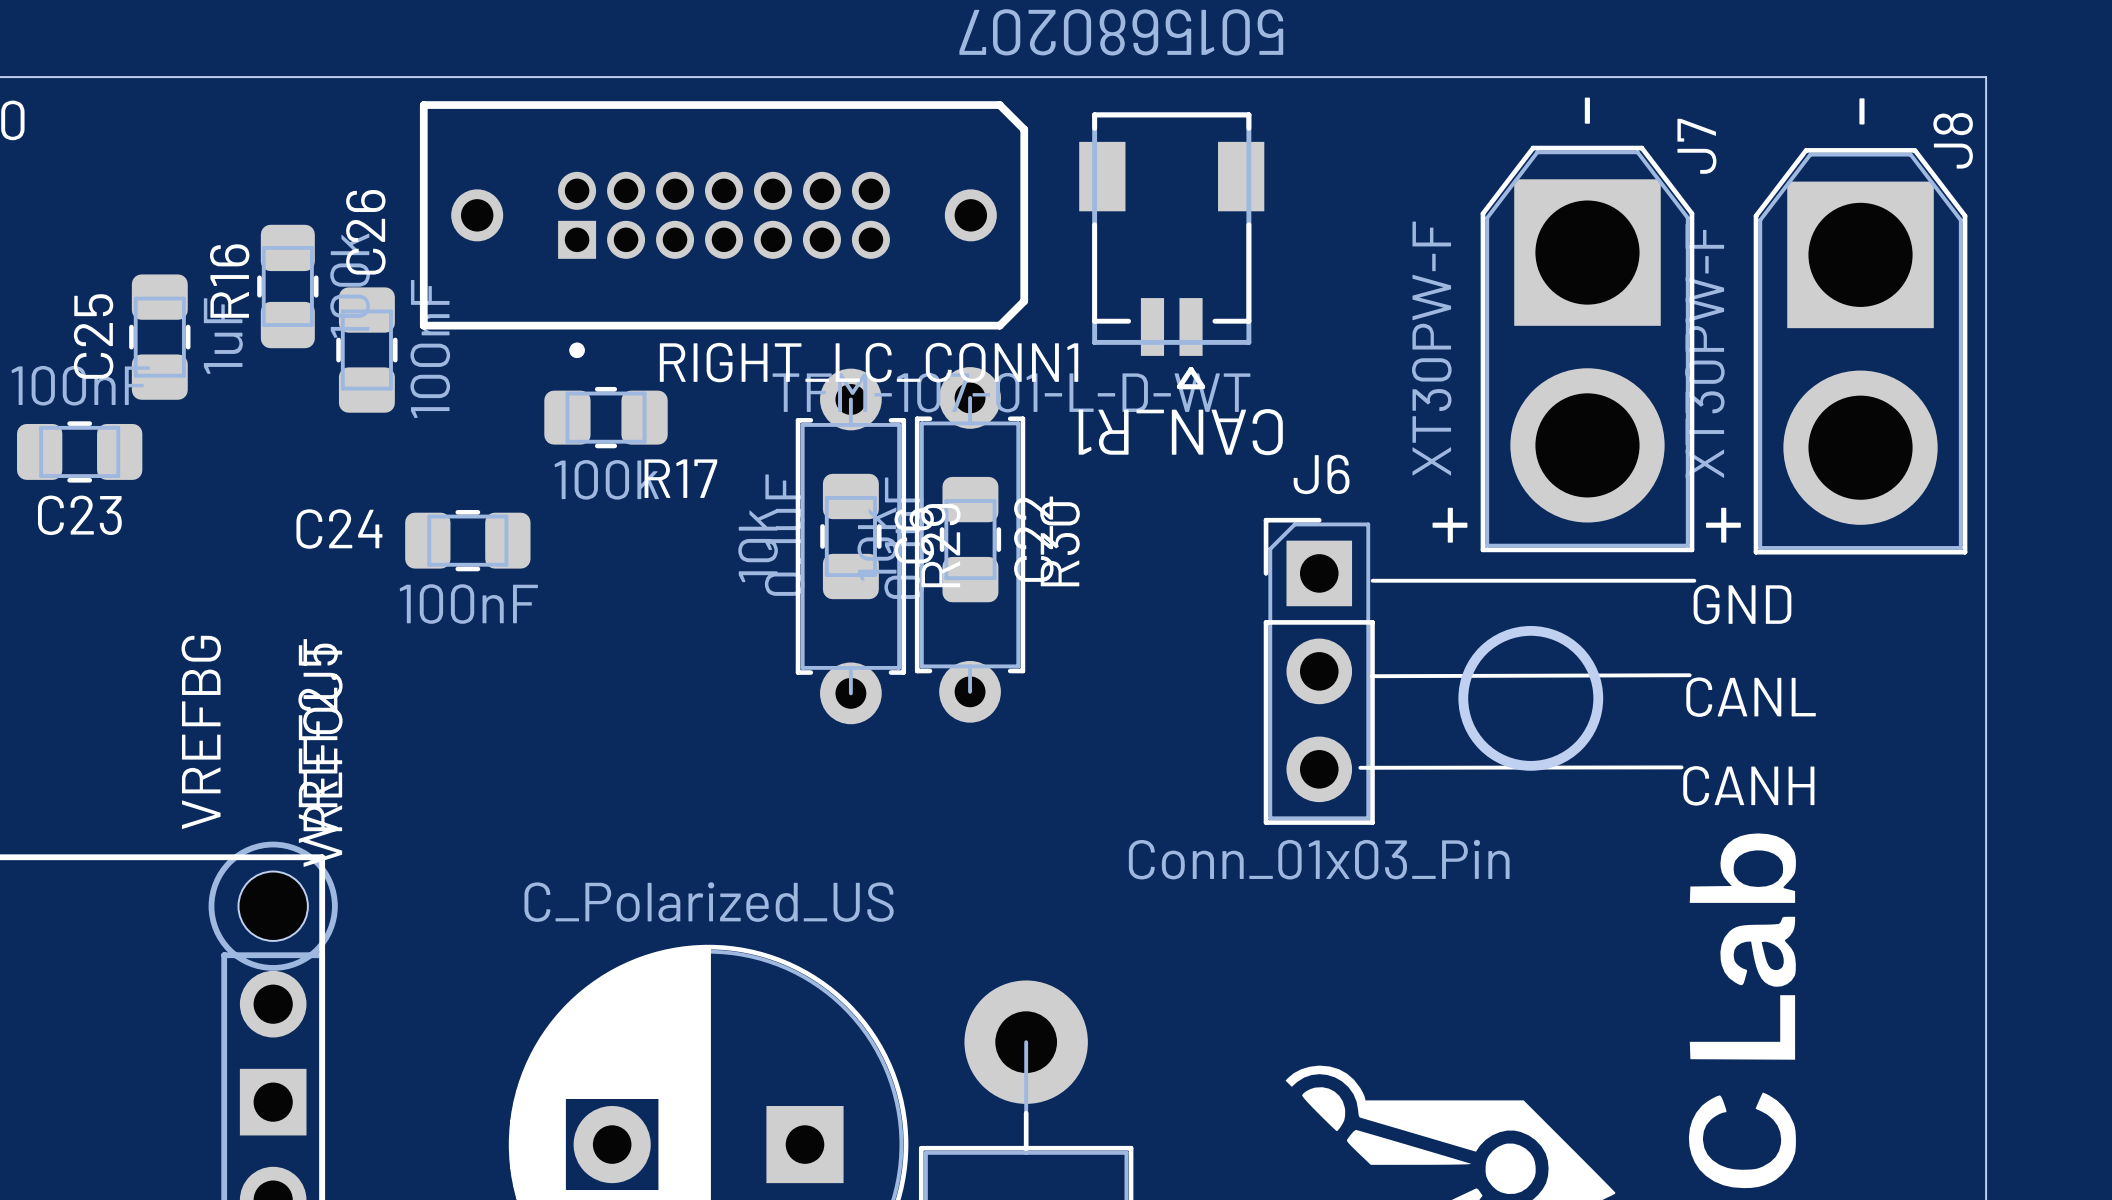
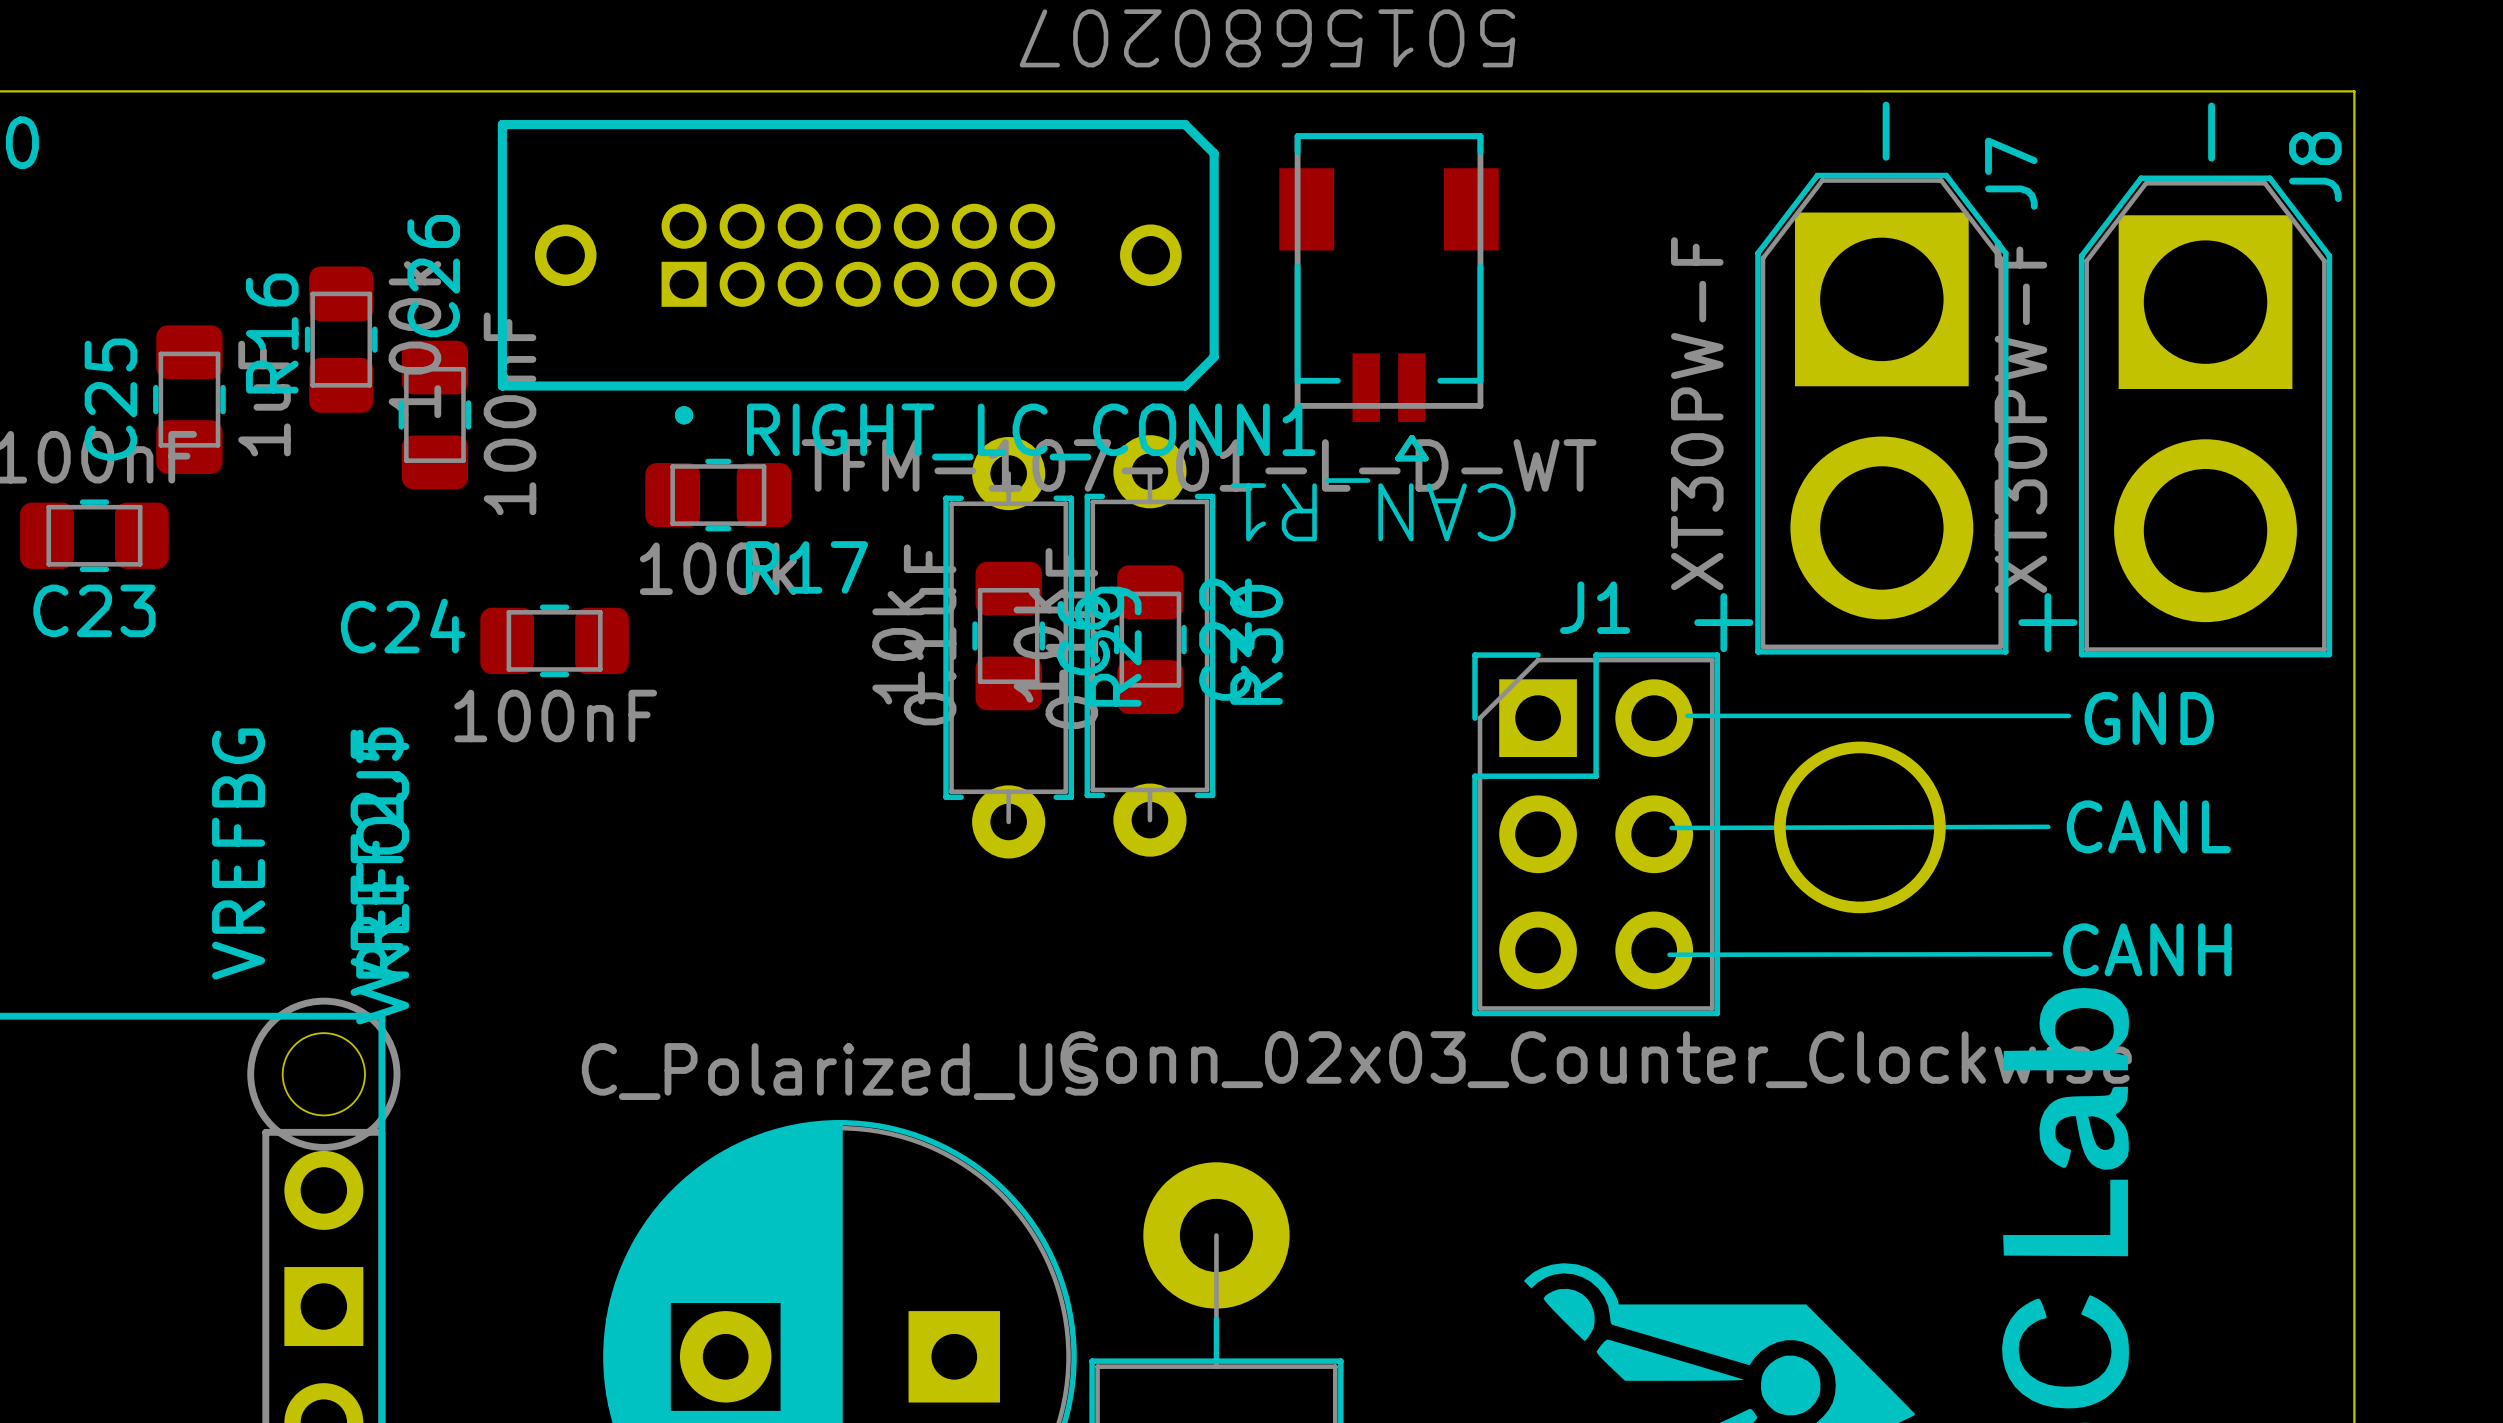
line: (1372, 580) (1694, 580) -> (1687, 715) (2068, 715)
text position: GND (1742, 604) -> GND (2149, 718)
J6: Conn_01x03_Pin (1319, 671) -> none
line: (1689, 675) (1371, 676) -> (2048, 826) (1671, 827)
text position: CANL (1751, 697) -> CANL (2148, 826)
round board edge position: (1530, 698) -> (1859, 827)
J1: none -> Conn_02x03_Counter_Clockwise (1596, 834)
line: (1681, 767) (1360, 767) -> (2050, 954) (1669, 954)
text position: CANH (1748, 785) -> CANH (2147, 949)

